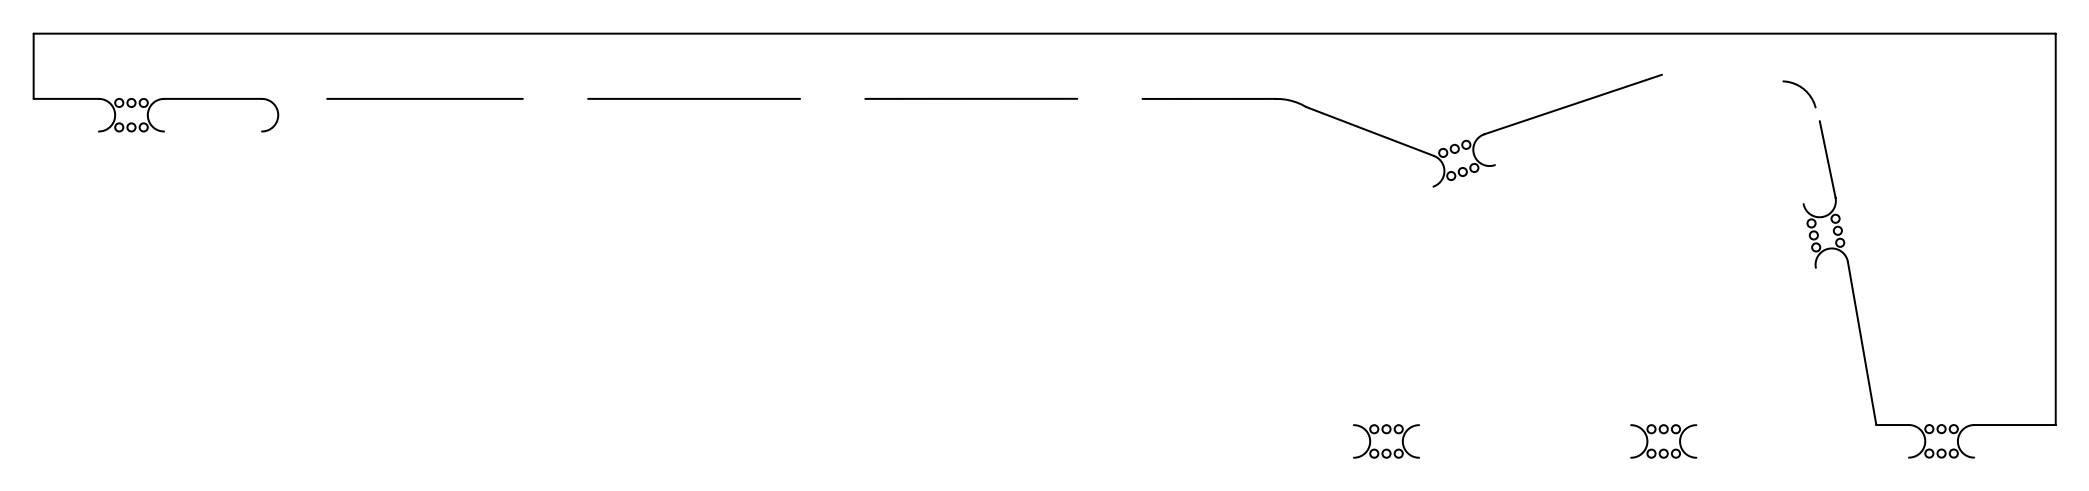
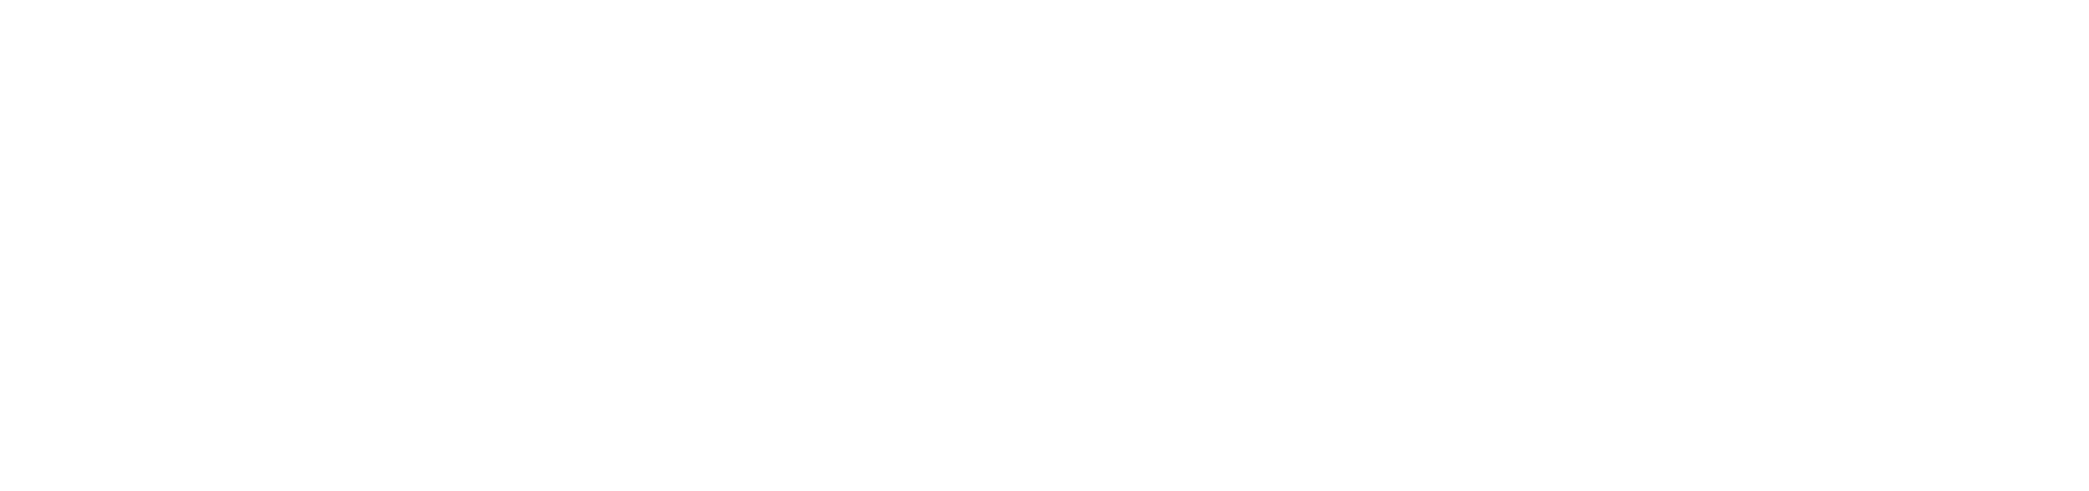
board edge: (1662, 74) (1482, 135) (1474, 143) (1474, 156) (1483, 164) (1494, 165) -> none
board edge: (1783, 81) (1792, 82) (1803, 89) (1809, 95) (1815, 107) -> none
board edge: (522, 98) (327, 98) -> none
board edge: (800, 98) (588, 98) -> none
board edge: (1077, 98) (865, 98) -> none
board edge: (1142, 98) (1275, 98) (1291, 100) (1435, 156) (1442, 163) (1444, 173) (1440, 182) (1433, 186) -> none
part: (131, 115) -> none
board edge: (1819, 121) (1835, 204) (1830, 213) (1820, 217) (1810, 214) (1803, 204) -> none
board edge: (98, 131) (108, 128) (114, 119) (113, 108) (107, 101) (98, 98) (33, 98) (33, 33) (2055, 33) (2055, 425) (1967, 426) (1960, 433) (1958, 443) (1962, 452) (1974, 457) -> none
board edge: (261, 131) (273, 126) (278, 115) (273, 103) (261, 98) (159, 99) (151, 105) (147, 117) (154, 128) (164, 131) -> none
part: (1458, 160) -> none
part: (1825, 233) -> none
board edge: (1815, 267) (1817, 257) (1826, 249) (1837, 249) (1846, 257) (1876, 425) (1911, 425) (1920, 429) (1924, 437) (1924, 447) (1917, 455) (1908, 457) -> none
board edge: (1353, 425) (1365, 429) (1370, 441) (1365, 452) (1353, 457) -> none
board edge: (1419, 425) (1407, 429) (1402, 441) (1407, 452) (1419, 457) -> none
board edge: (1631, 425) (1643, 430) (1647, 441) (1643, 452) (1631, 457) -> none
board edge: (1696, 425) (1684, 430) (1680, 441) (1685, 453) (1696, 457) -> none
part: (1386, 441) -> none
part: (1663, 441) -> none
part: (1941, 441) -> none

